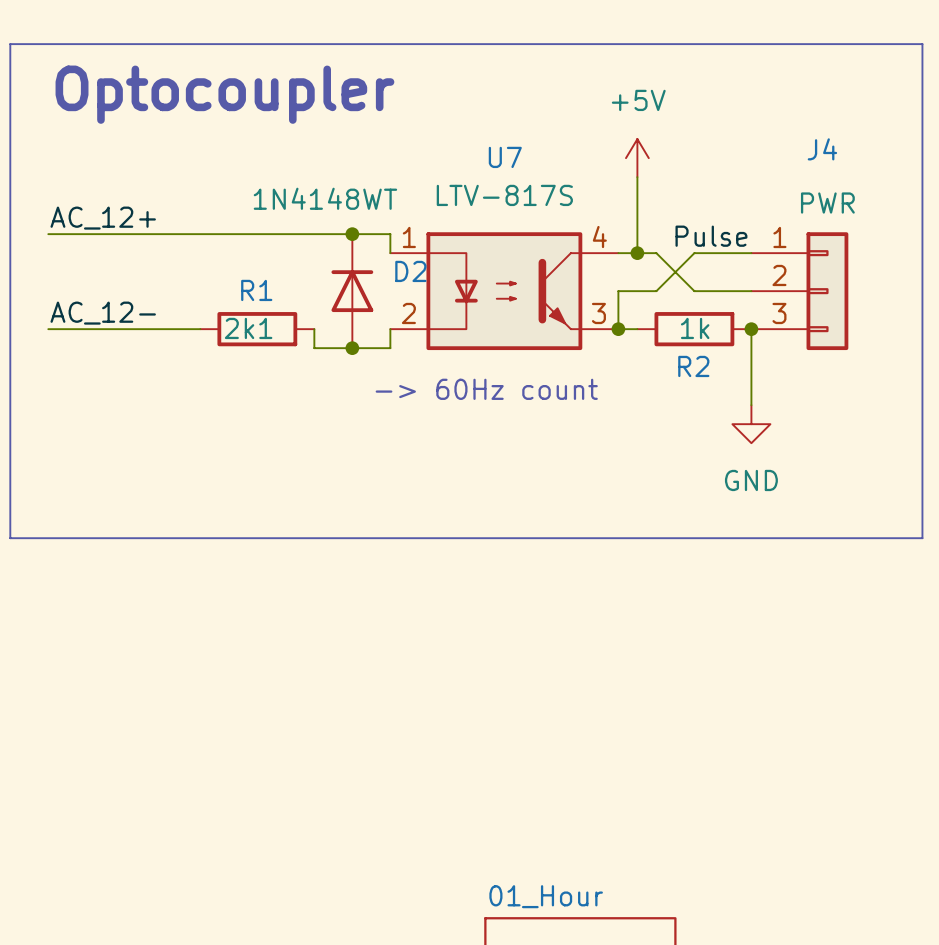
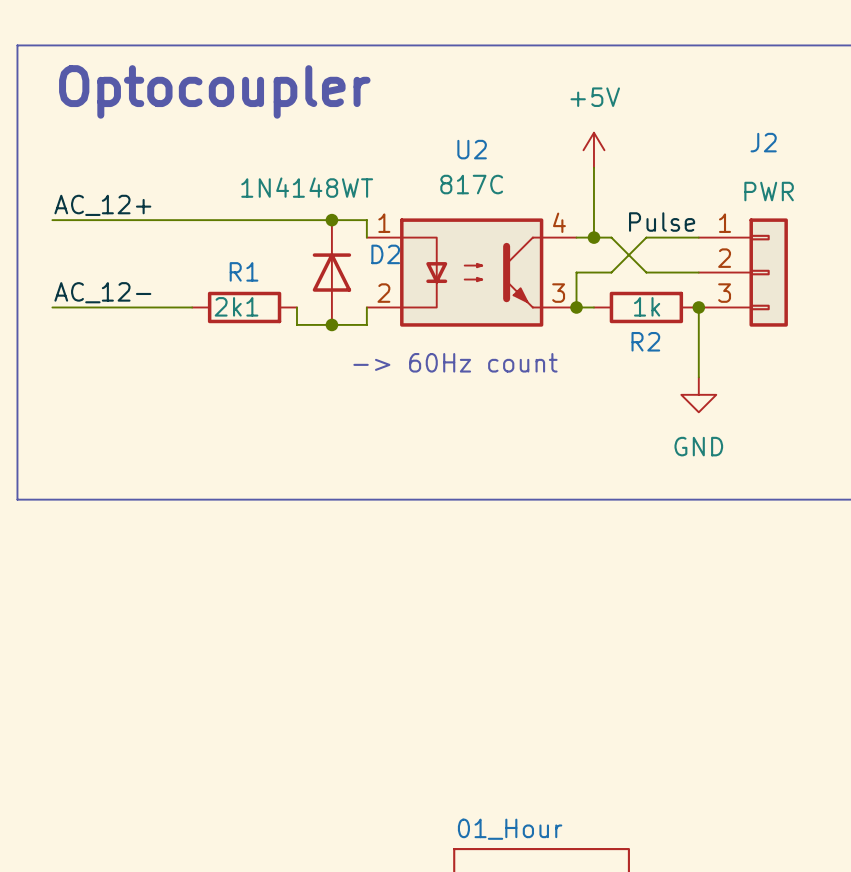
J4 name: J4 (822, 149) -> J2 (763, 142)
U7 name: U7 (505, 157) -> U2 (472, 149)
U7 value: LTV-817S (504, 195) -> 817C (471, 184)

